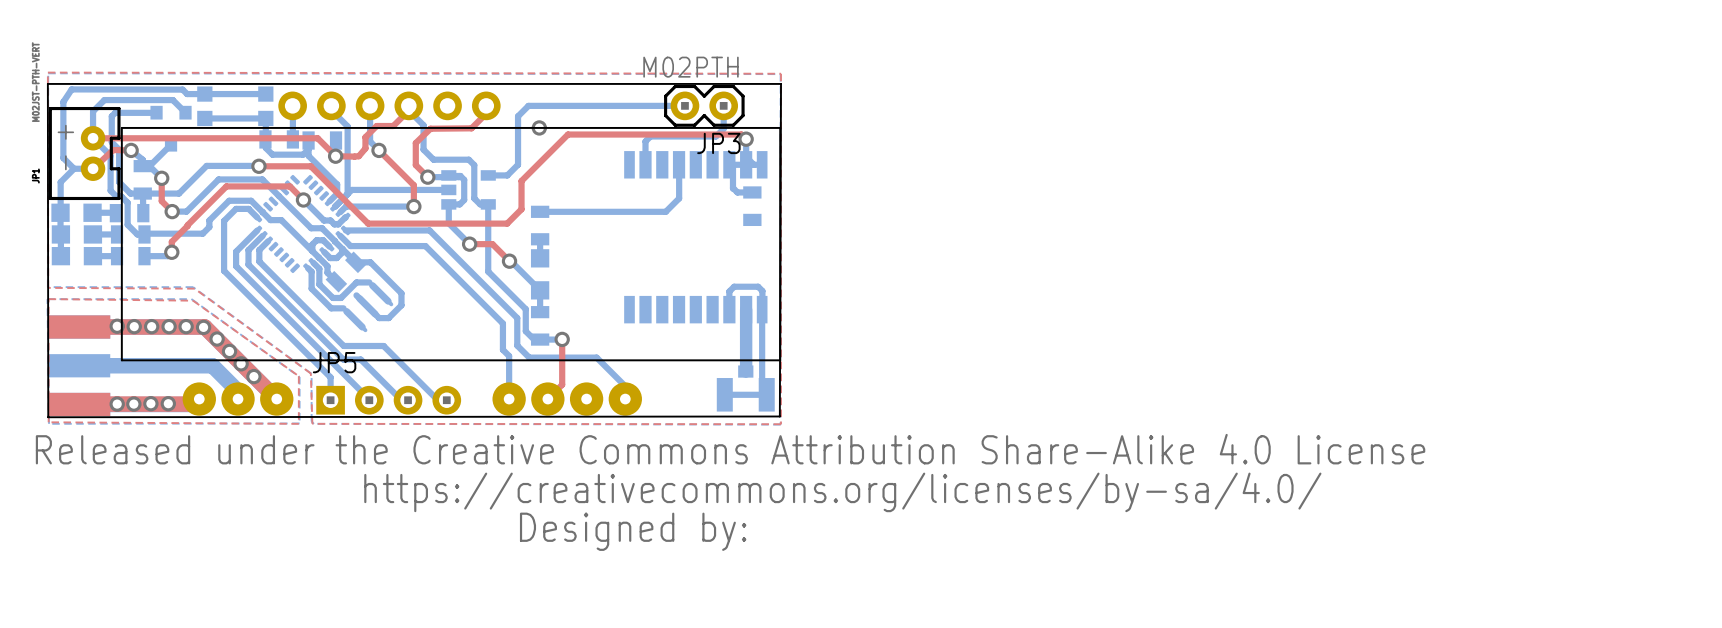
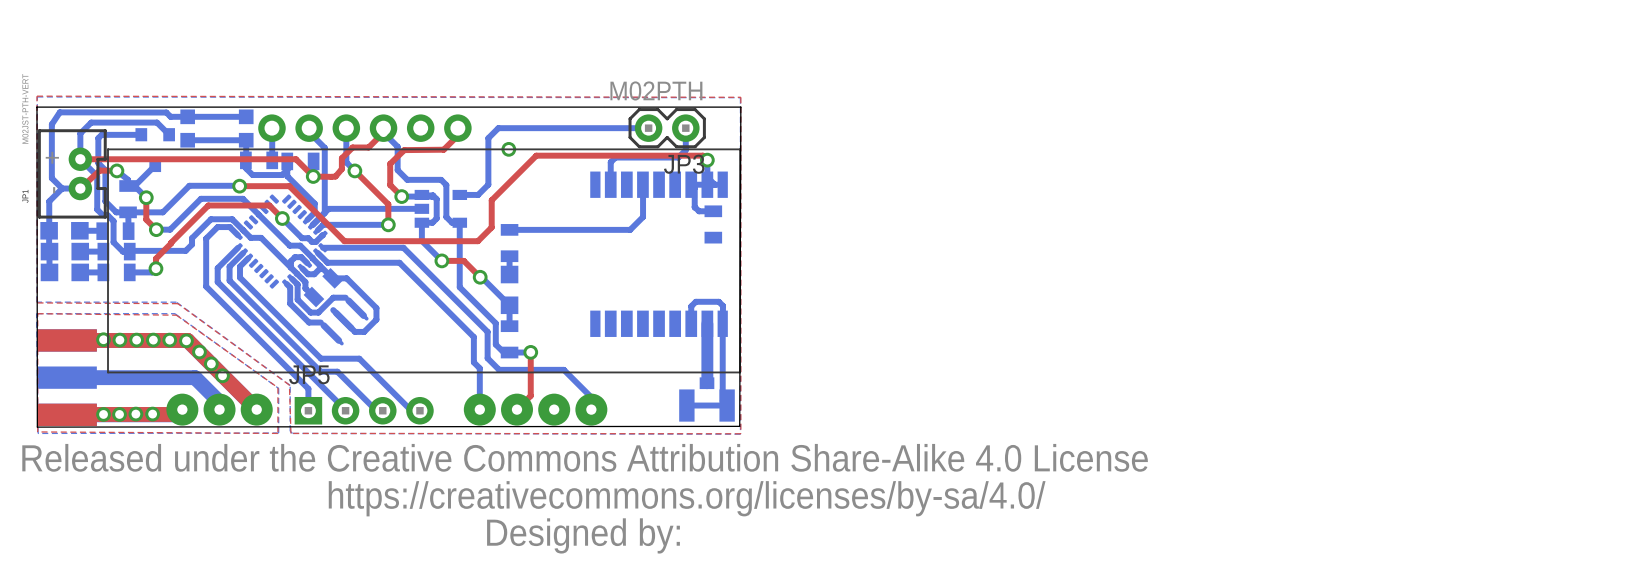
via: (253, 376) -> none

